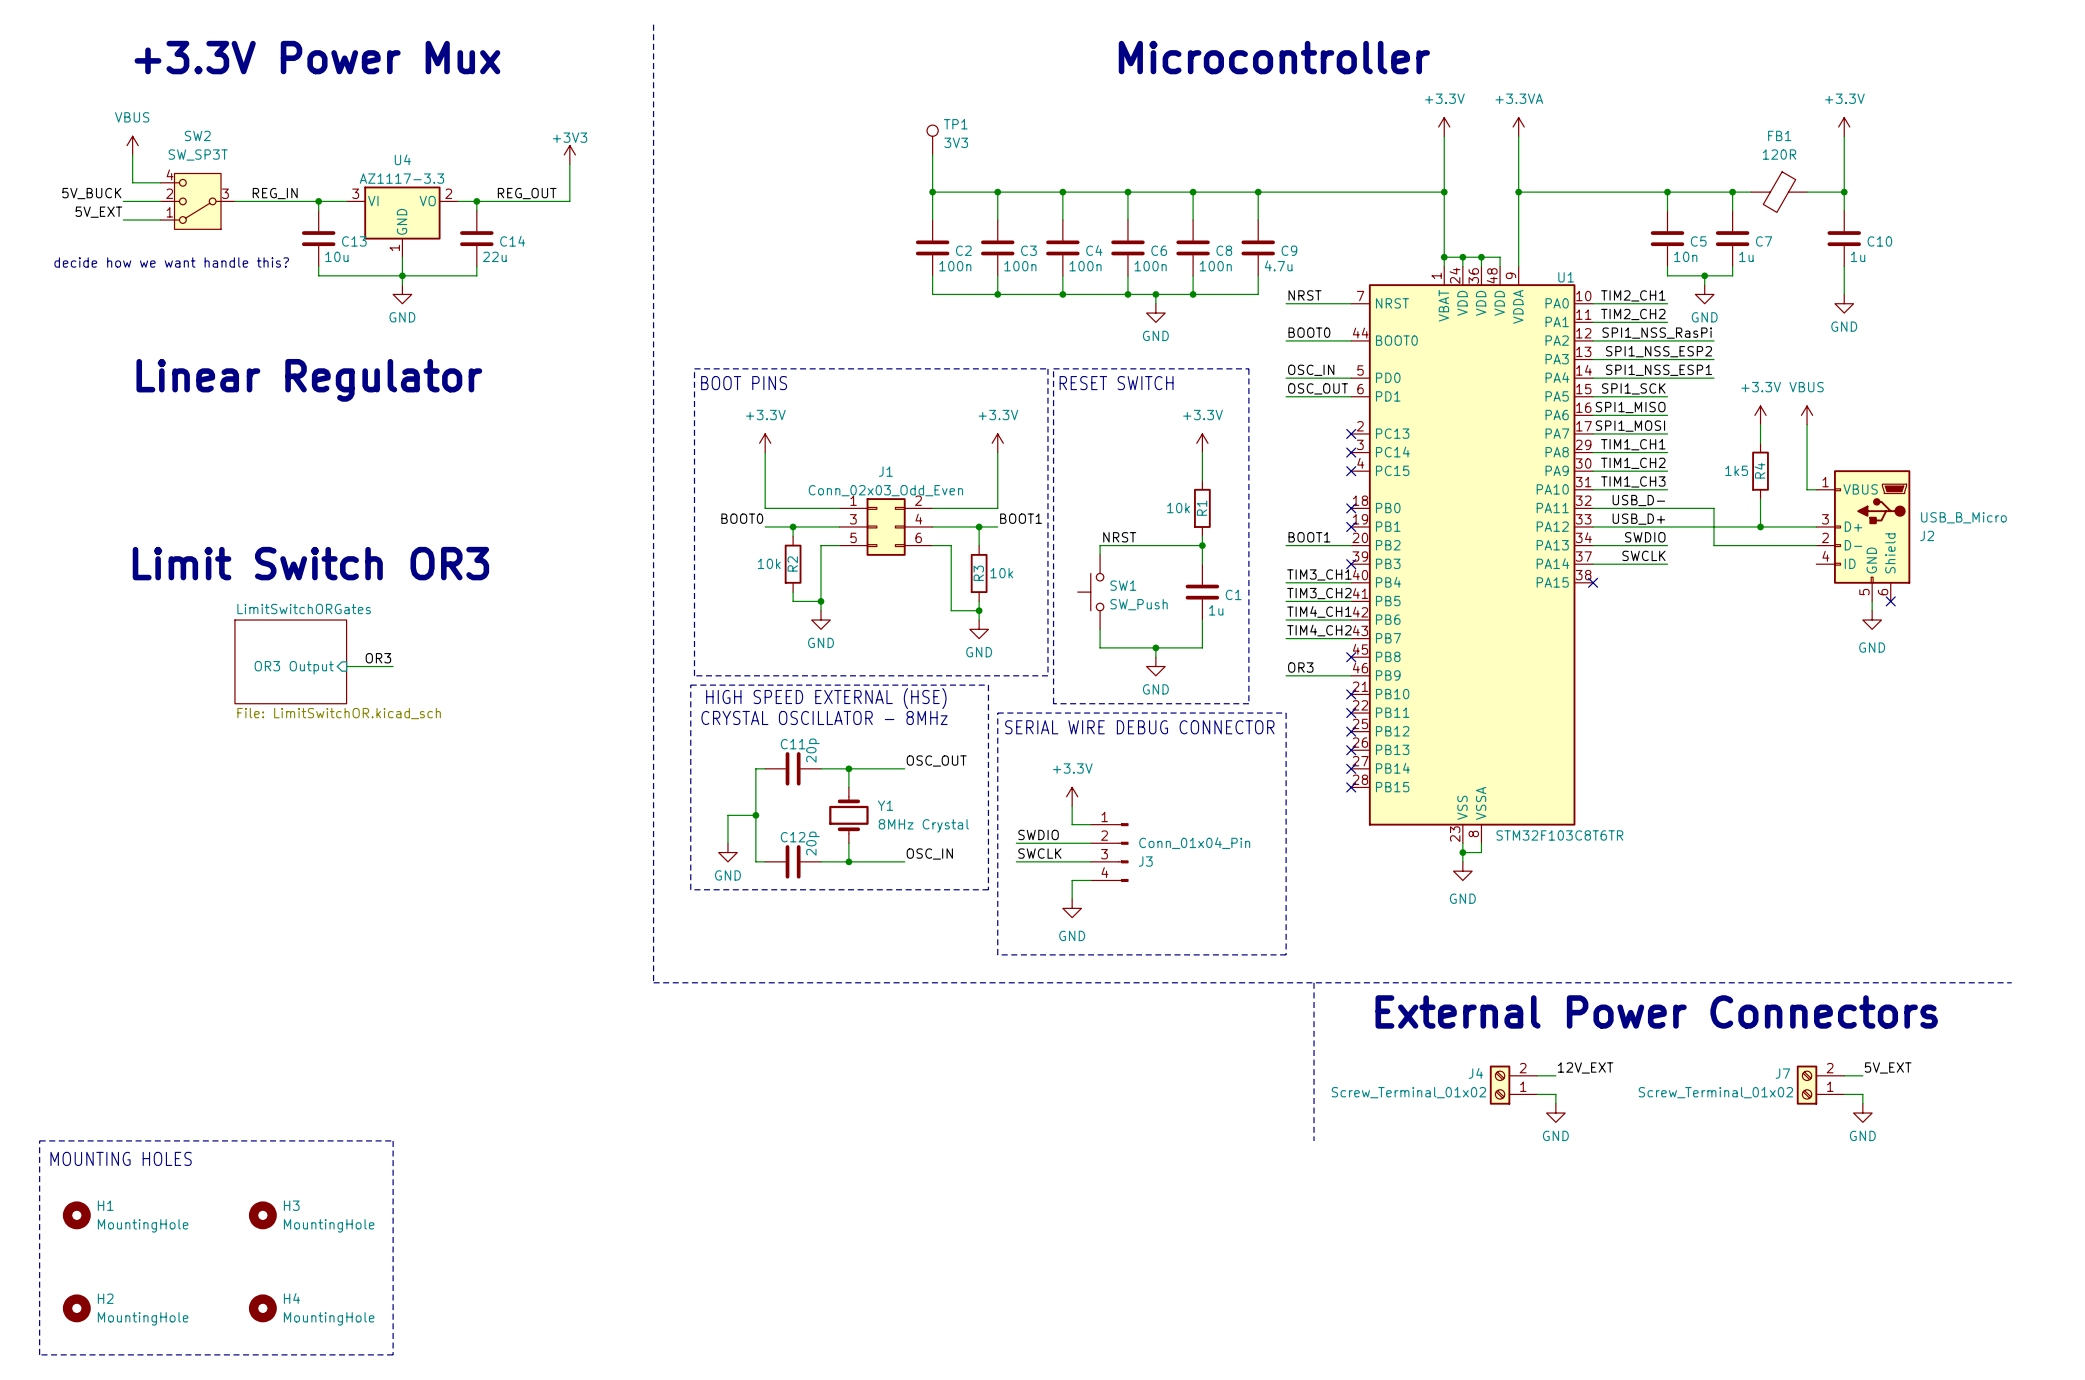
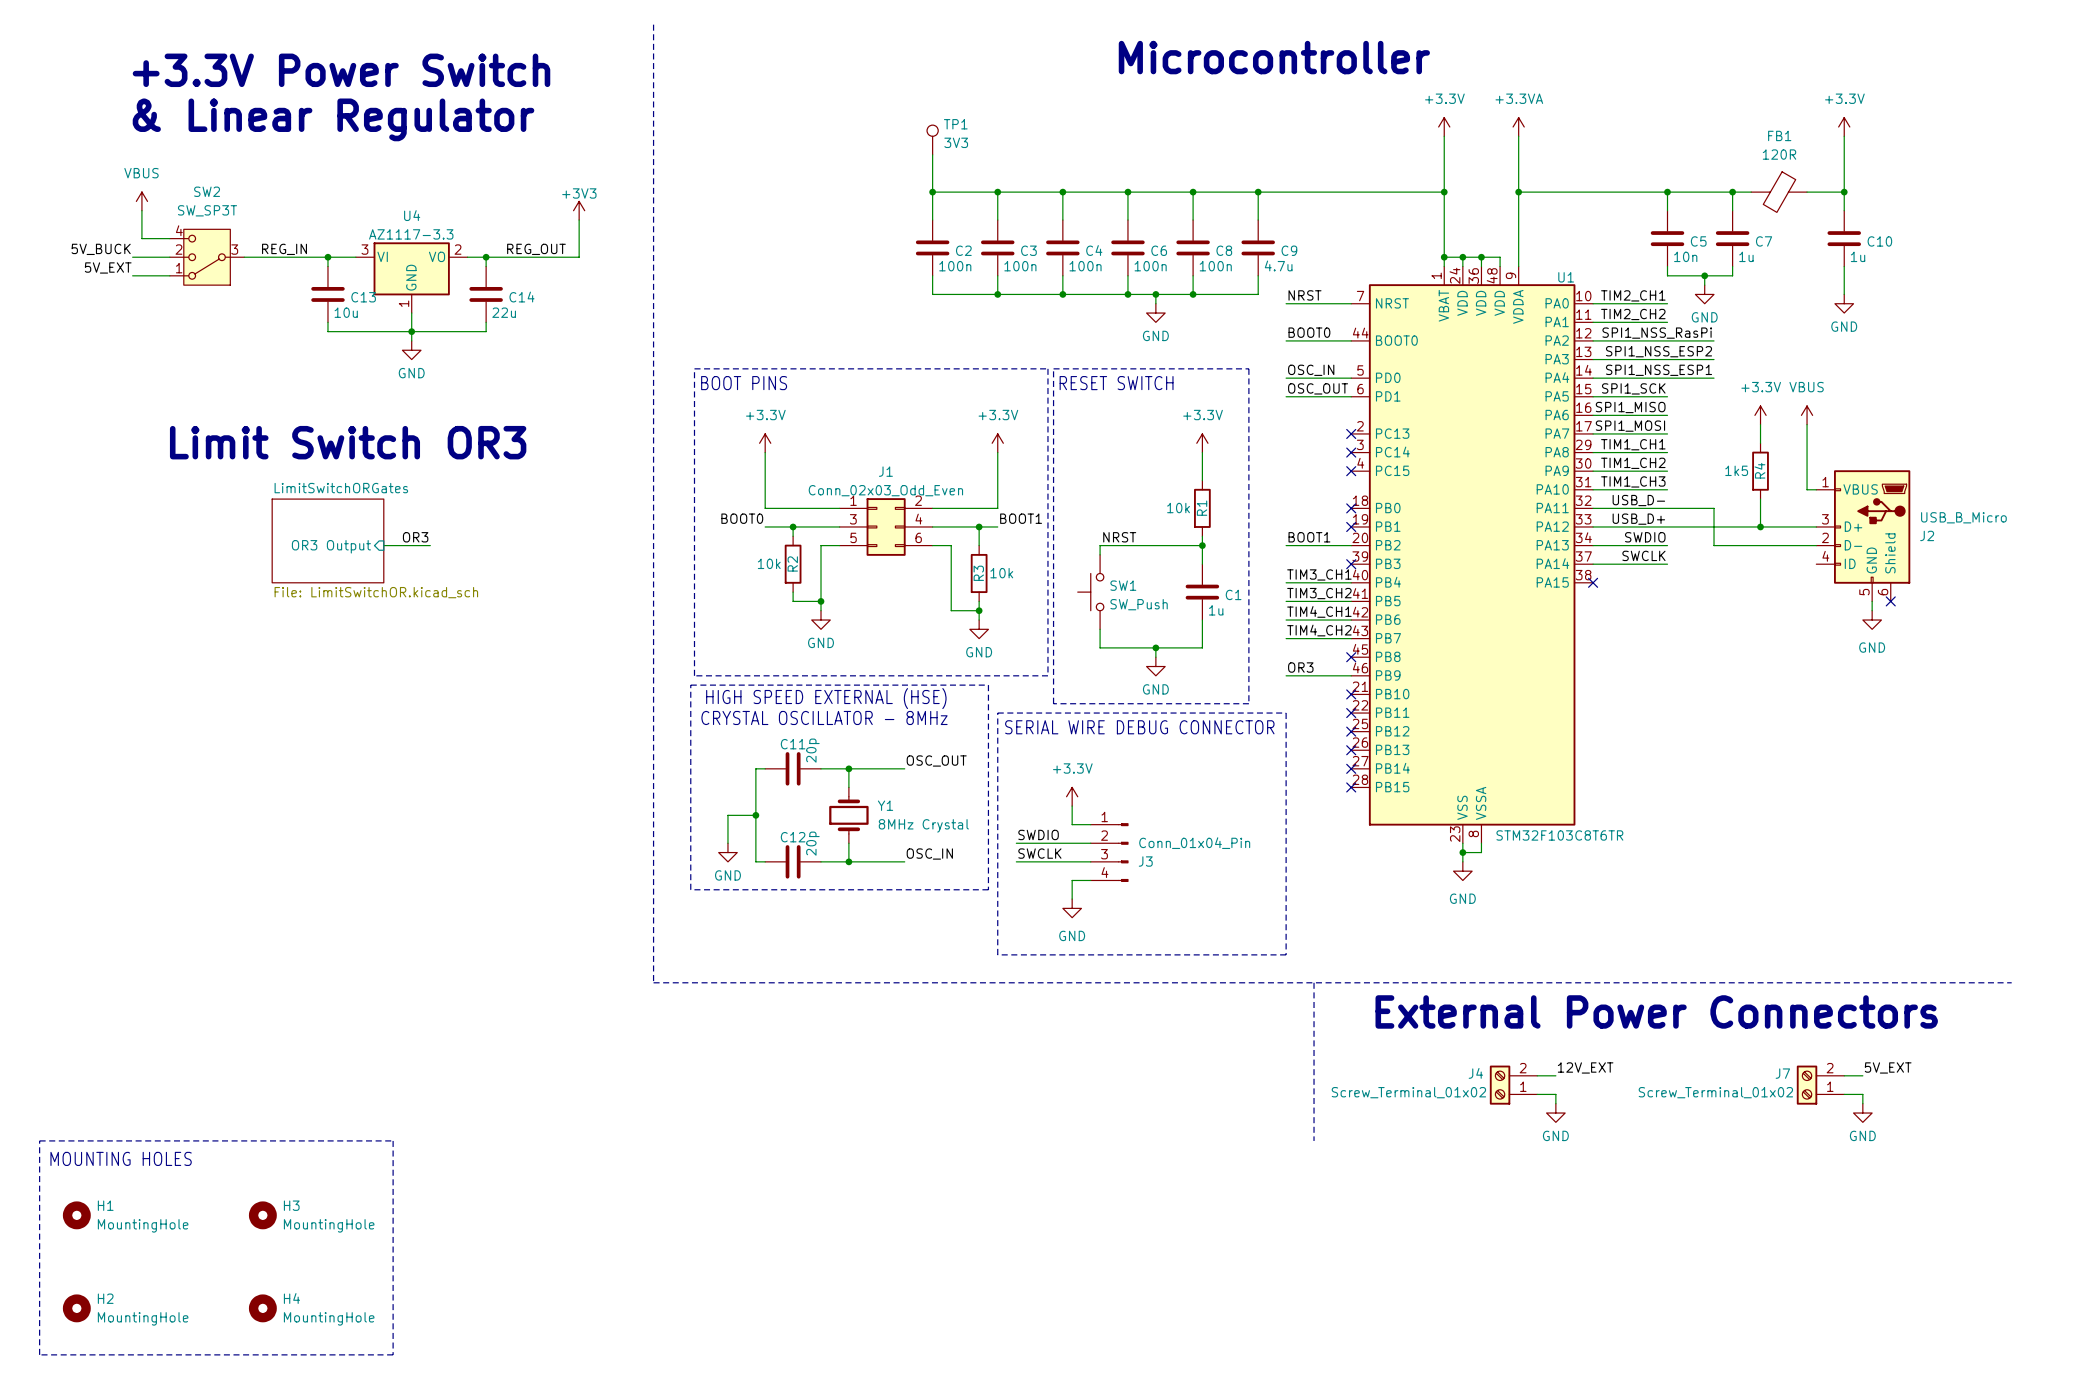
text: +3.3V Power Mux (317, 57) -> +3.3V Power Switch (341, 70)
text: none -> & Linear Regulator (333, 119)
power symbol position: VBUS (132, 145) -> VBUS (141, 201)
wire: (132, 154) (132, 182) (160, 182) -> (141, 210) (141, 238) (169, 238)
power symbol position: +3V3 (569, 154) -> +3V3 (579, 210)
wire: (569, 164) (569, 201) (458, 201) -> (579, 220) (579, 257) (467, 257)
label position: 5V_BUCK (91, 193) -> 5V_BUCK (101, 249)
label position: REG_IN (275, 193) -> REG_IN (284, 249)
label position: REG_OUT (527, 193) -> REG_OUT (536, 249)
wire: (123, 201) (160, 201) -> (132, 257) (169, 257)
SW2 position: (197, 201) -> (207, 257)
wire: (234, 201) (346, 201) -> (244, 257) (355, 257)
wire: (318, 201) (318, 210) -> (327, 257) (327, 266)
junction: (318, 201) -> none
wire: (476, 201) (476, 210) -> (486, 257) (486, 266)
junction: (476, 201) -> none
label position: 5V_EXT (98, 212) -> 5V_EXT (108, 267)
wire: (123, 220) (160, 220) -> (132, 275) (169, 275)
U4 position: (402, 221) -> (411, 277)
C13 position: (318, 238) -> (327, 294)
C14 position: (476, 238) -> (486, 294)
junction: none -> (327, 257)
junction: none -> (486, 257)
text: decide how we want handle this? (171, 262) -> none
wire: (318, 266) (318, 275) (476, 275) (476, 266) -> (327, 322) (327, 331) (486, 331) (486, 322)
junction: (402, 275) -> none
power symbol position: GND (402, 294) -> GND (411, 350)
junction: none -> (411, 331)
text: Linear Regulator (309, 380) -> none
text position: Limit Switch OR3 (310, 563) -> Limit Switch OR3 (348, 442)
label position: OR3 (378, 658) -> OR3 (415, 537)
sheet LimitSwitchORGates position: (290, 661) -> (327, 540)
wire: (346, 666) (393, 666) -> (383, 545) (430, 545)
sheet pin position: OR3 Output (294, 667) -> OR3 Output (331, 546)

